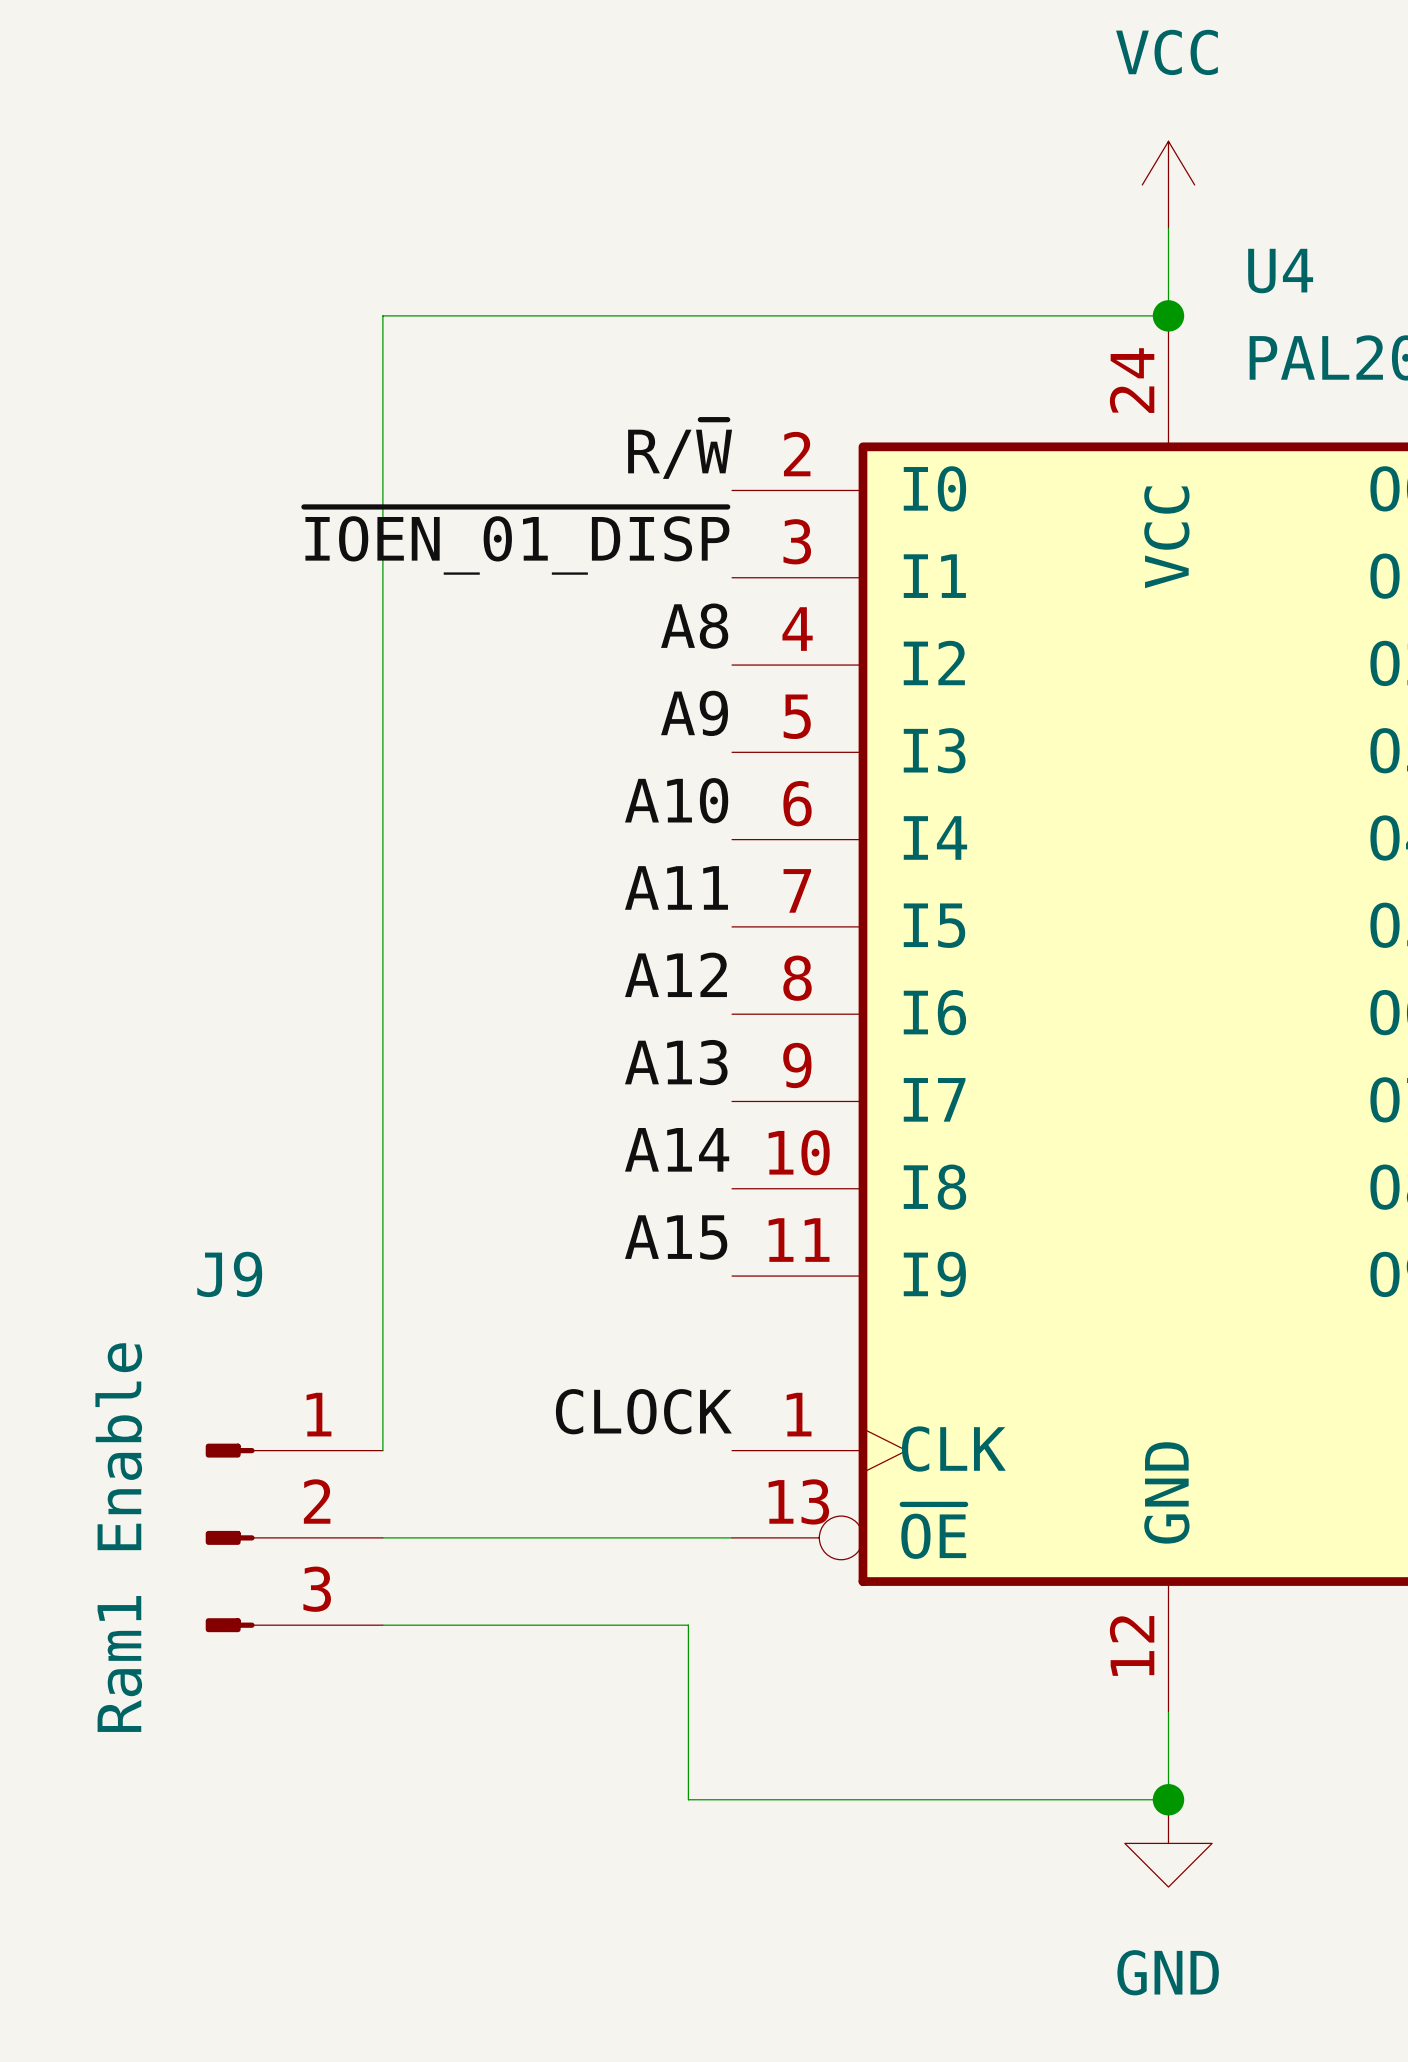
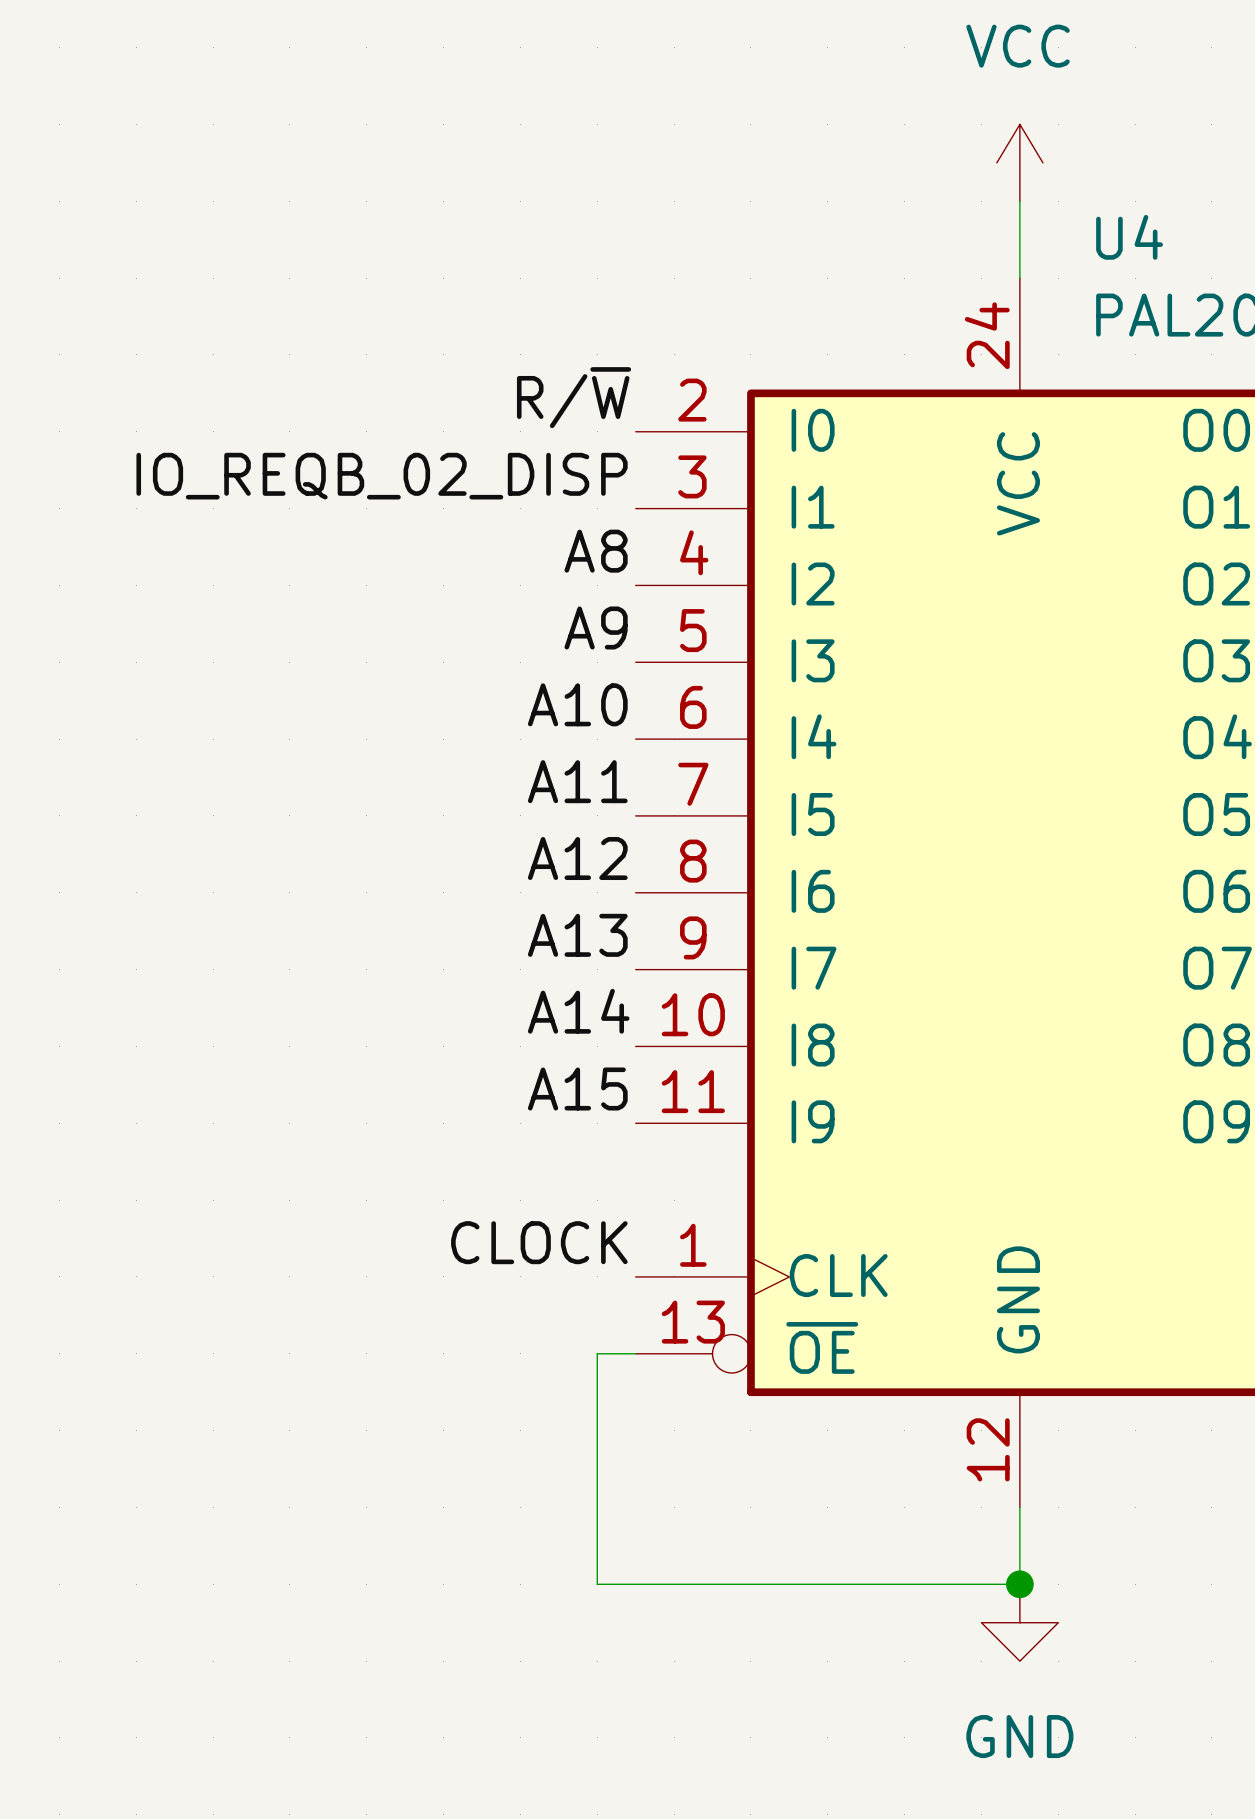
wire: (1168, 315) (382, 315) (382, 1450) -> none
junction: (1168, 315) -> none
label: ~{IOEN_01_DISP} (516, 540) -> IO_REQB_02_DISP (382, 476)
J9: Ram1 Enable (294, 1537) -> none
wire: (382, 1537) (688, 1537) -> (597, 1430) (597, 1353)
wire: (382, 1625) (688, 1625) -> none

